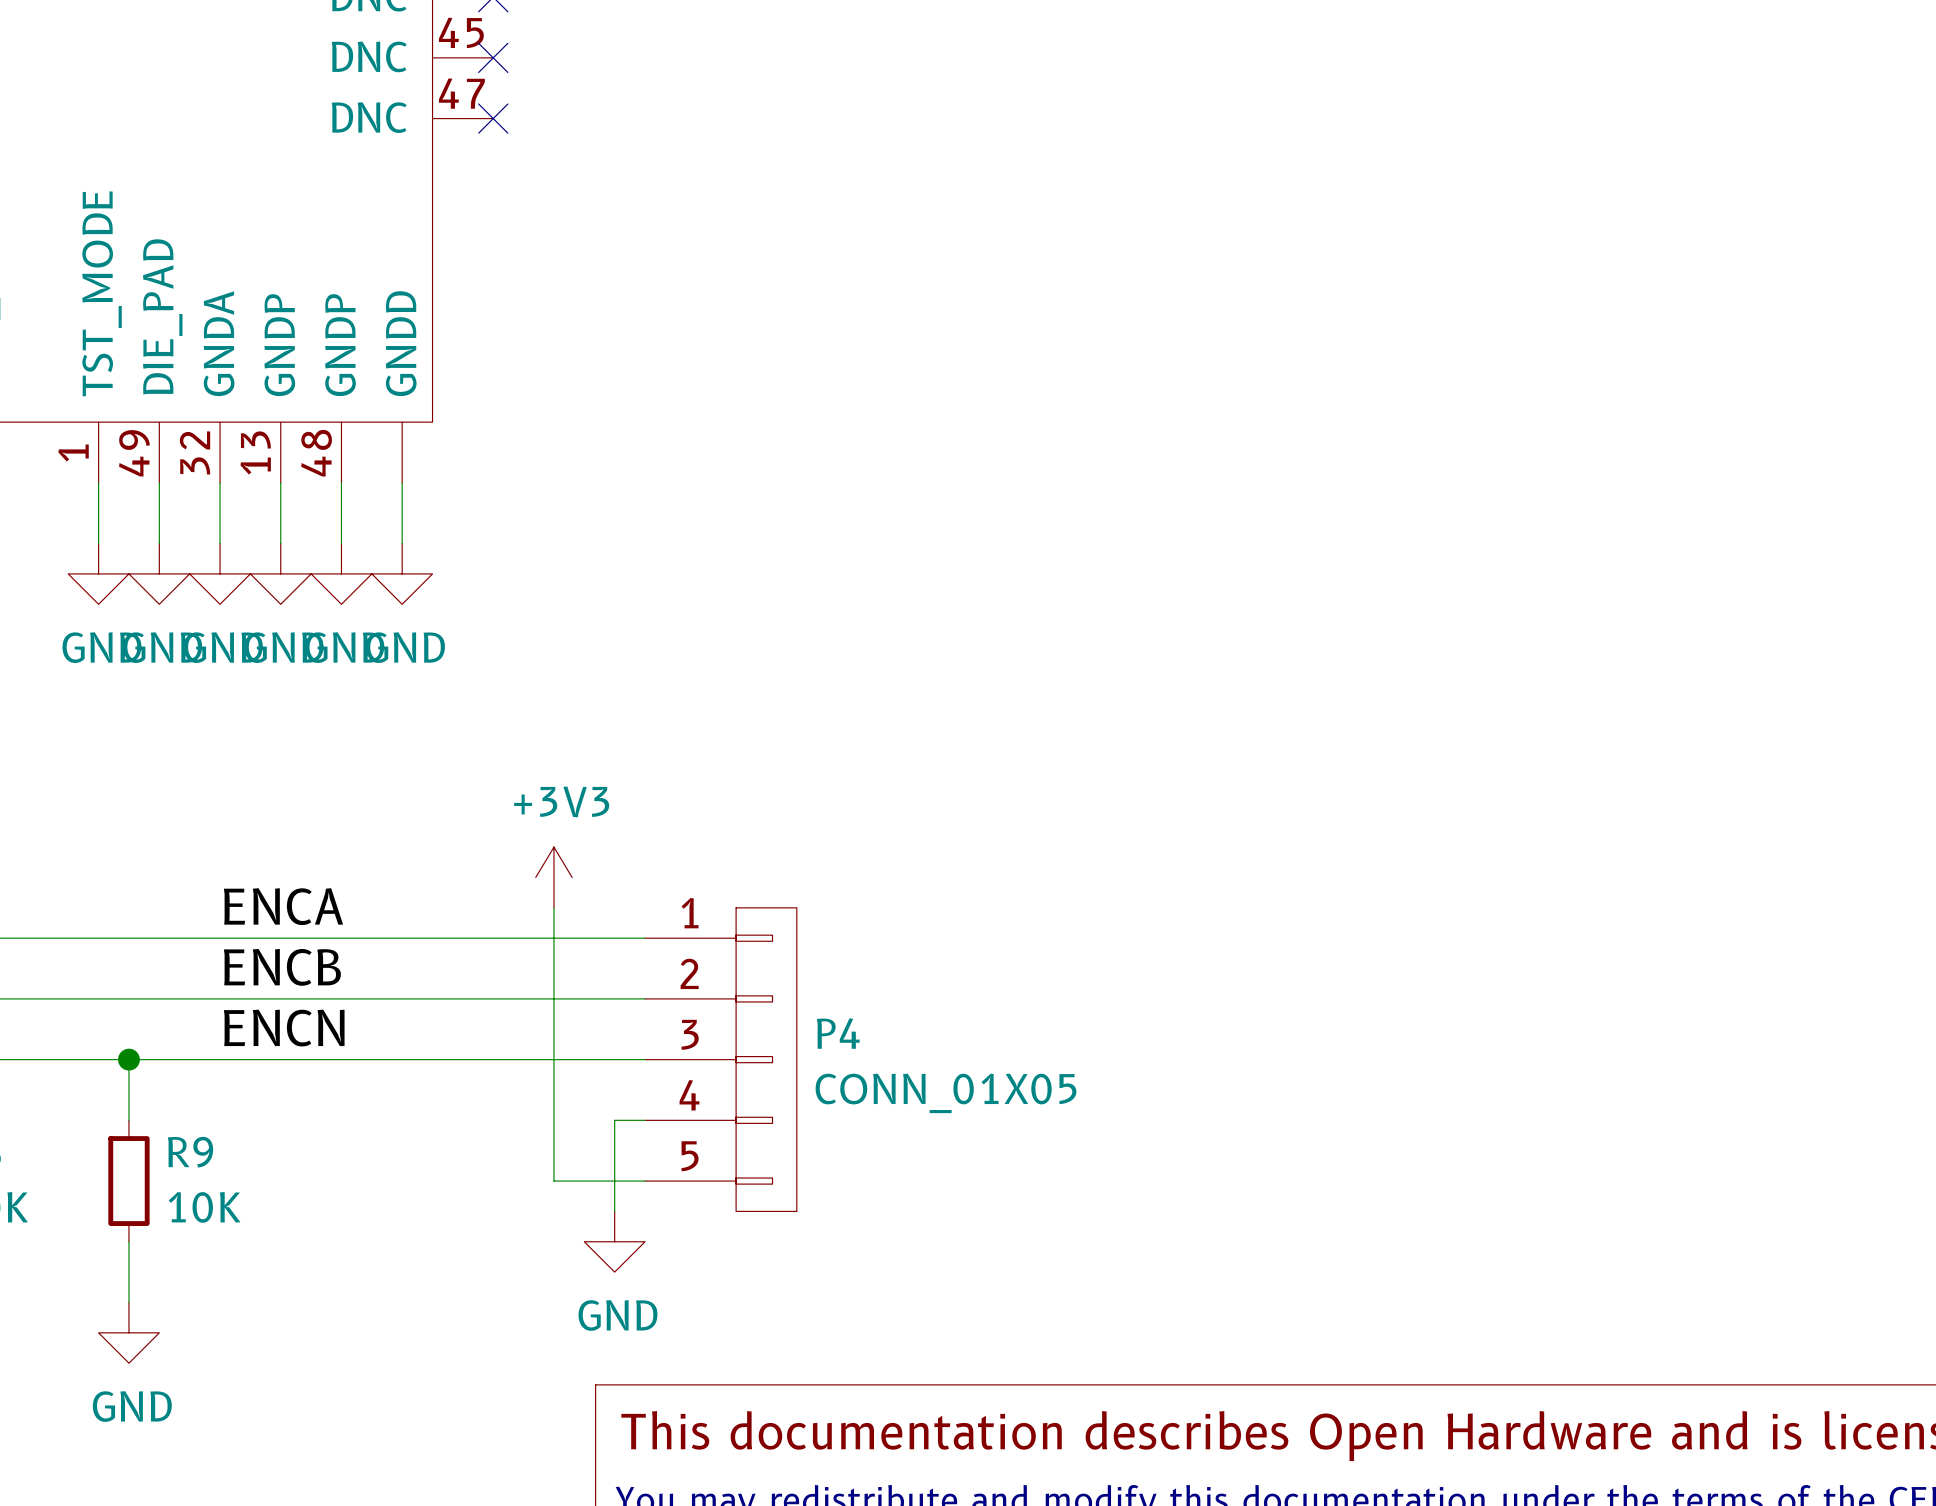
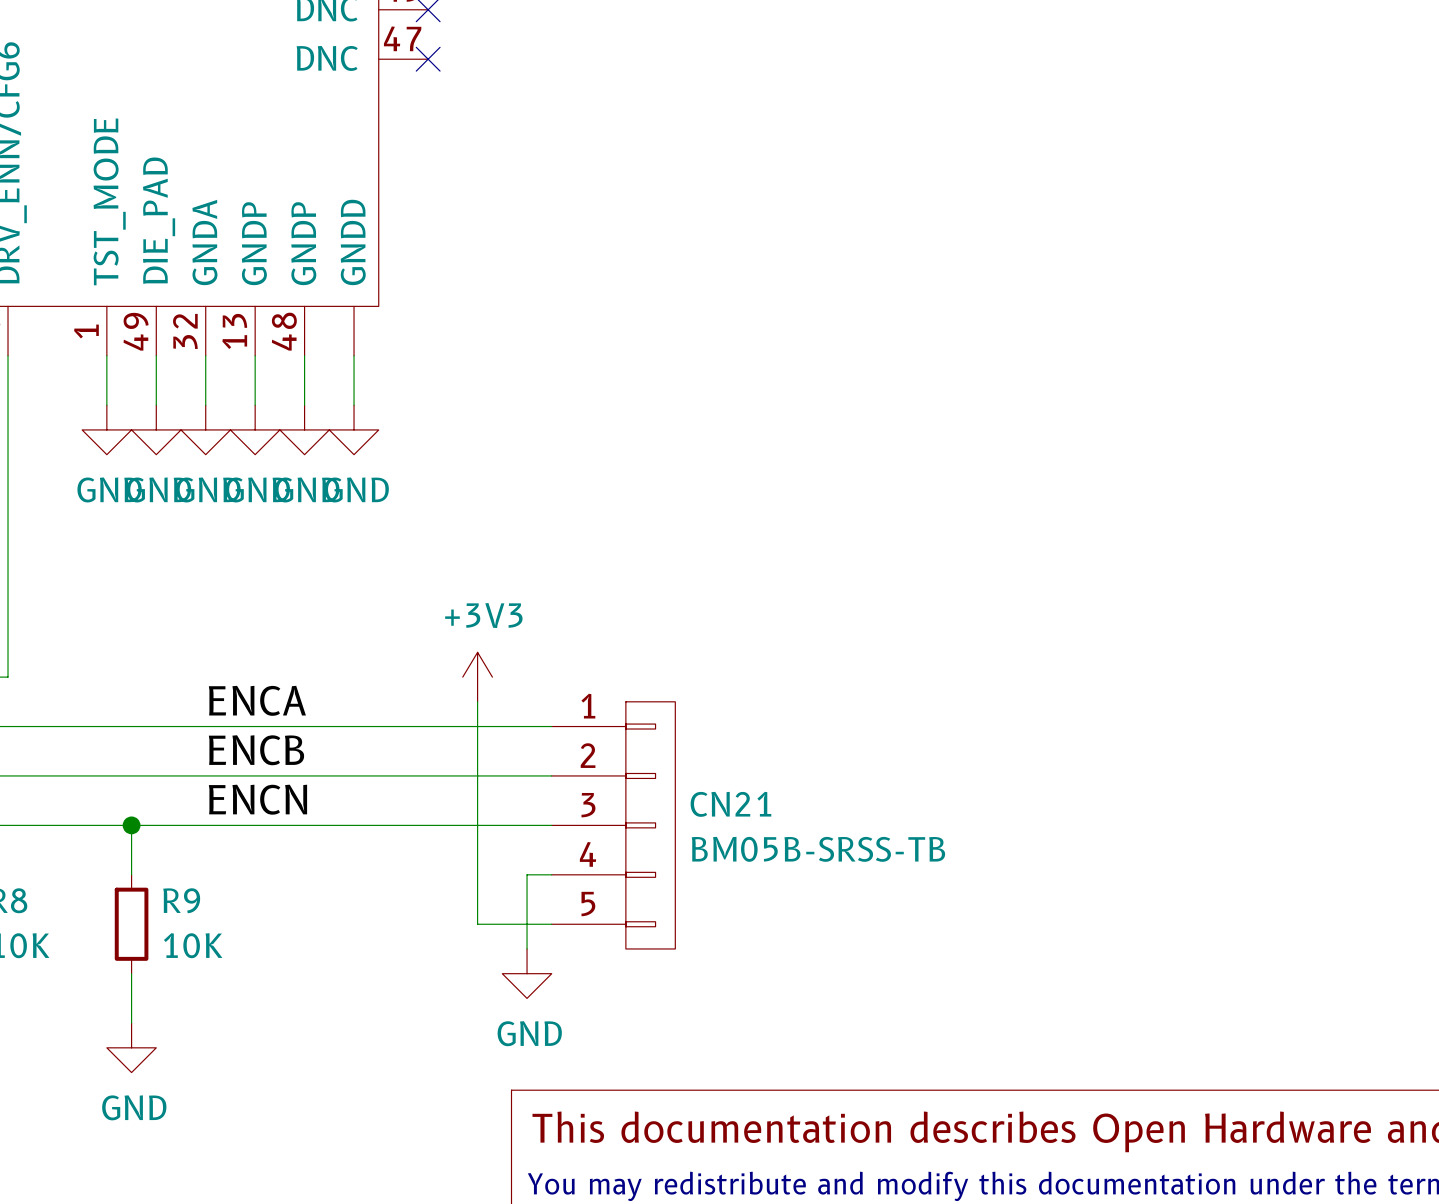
P4 name: P4 (838, 1033) -> CN21 (730, 804)
P4 value: CONN_01X05 (946, 1093) -> BM05B-SRSS-TB (818, 849)

